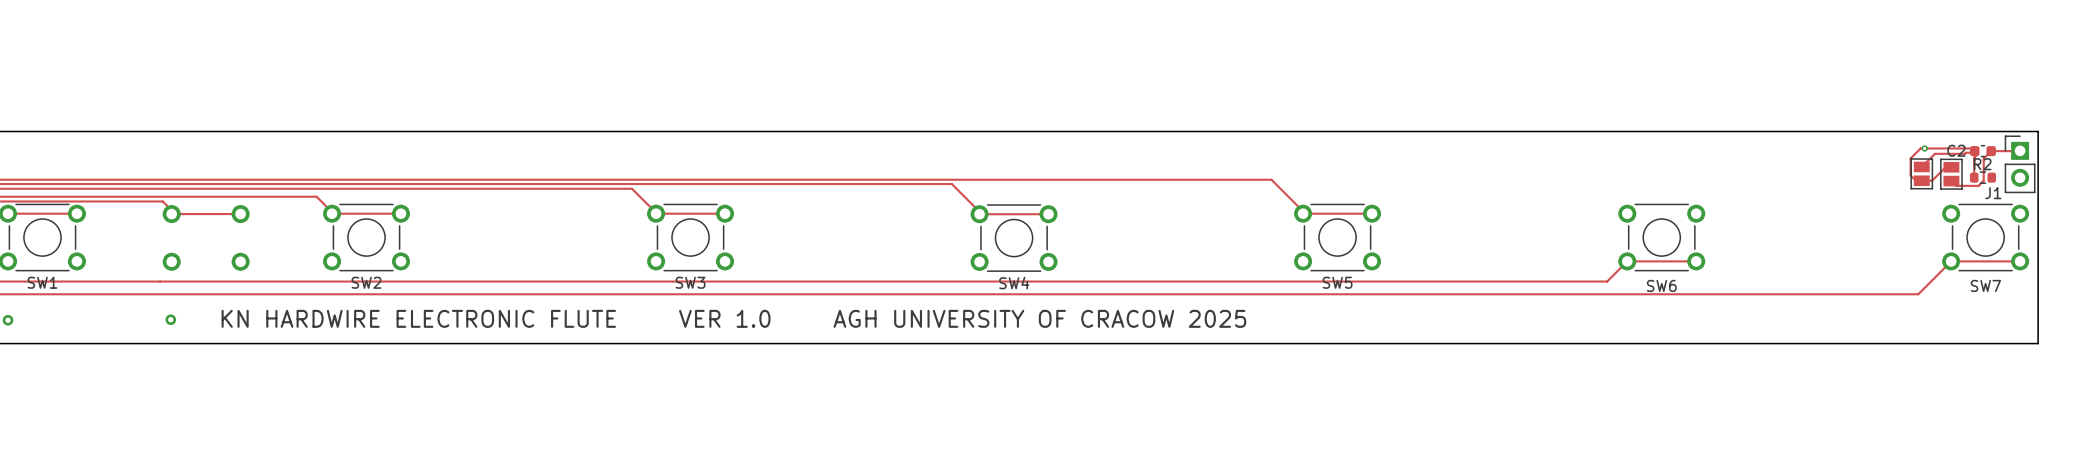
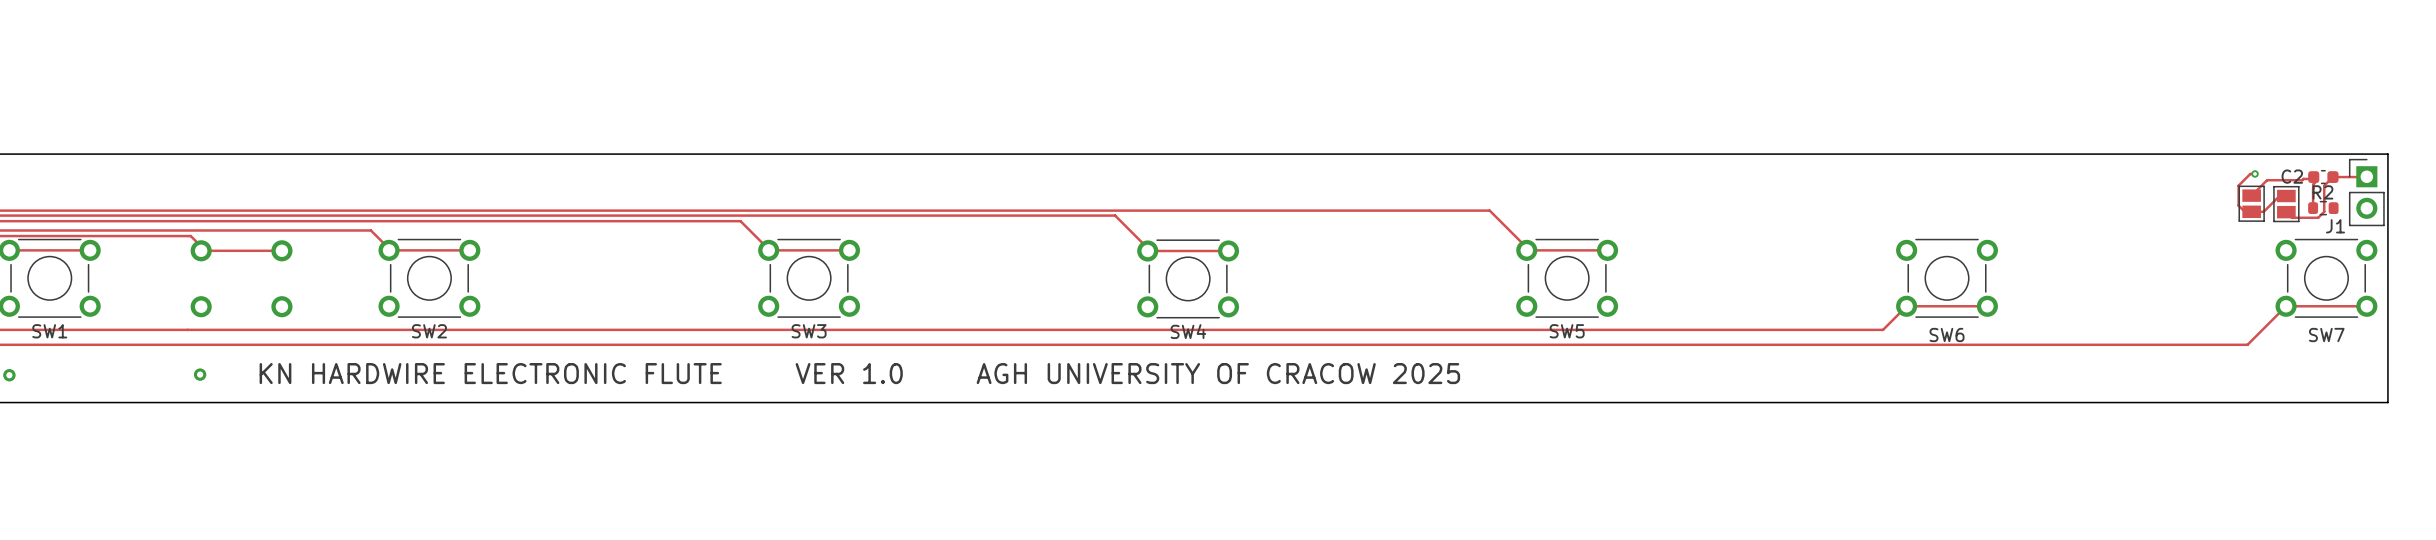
track: (1924, 148) (1972, 148) -> none

